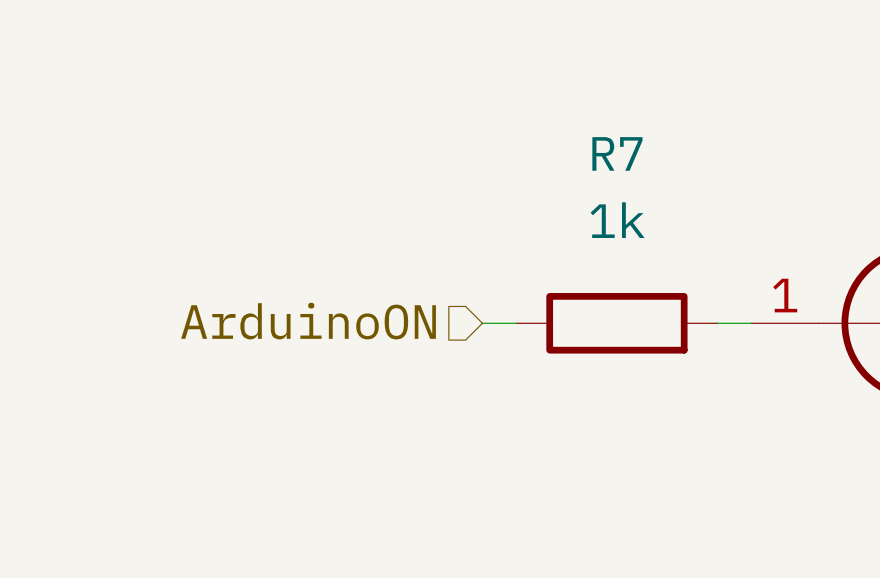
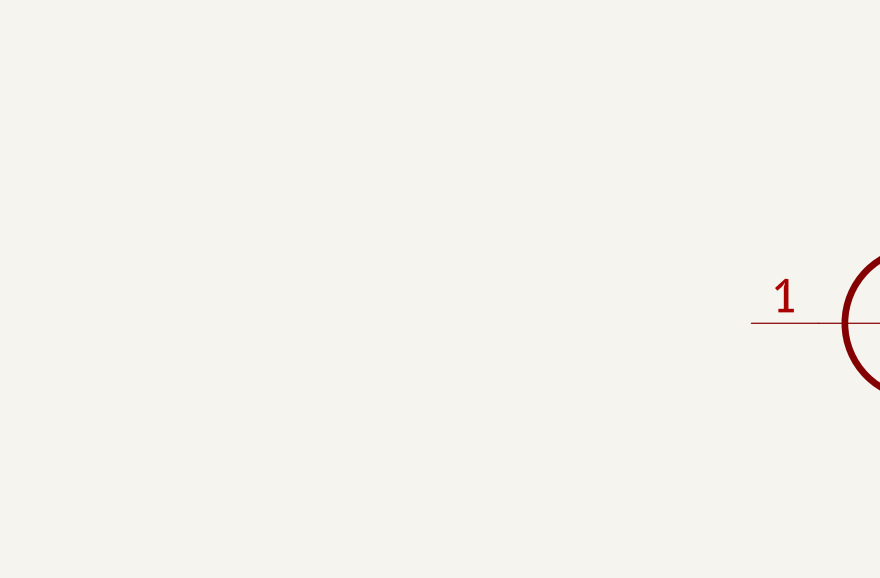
hierarchical label: ArduinoON (308, 321) -> none
wire: (482, 323) (516, 323) -> none
R7: 1k (616, 323) -> none
wire: (717, 323) (751, 323) -> none

